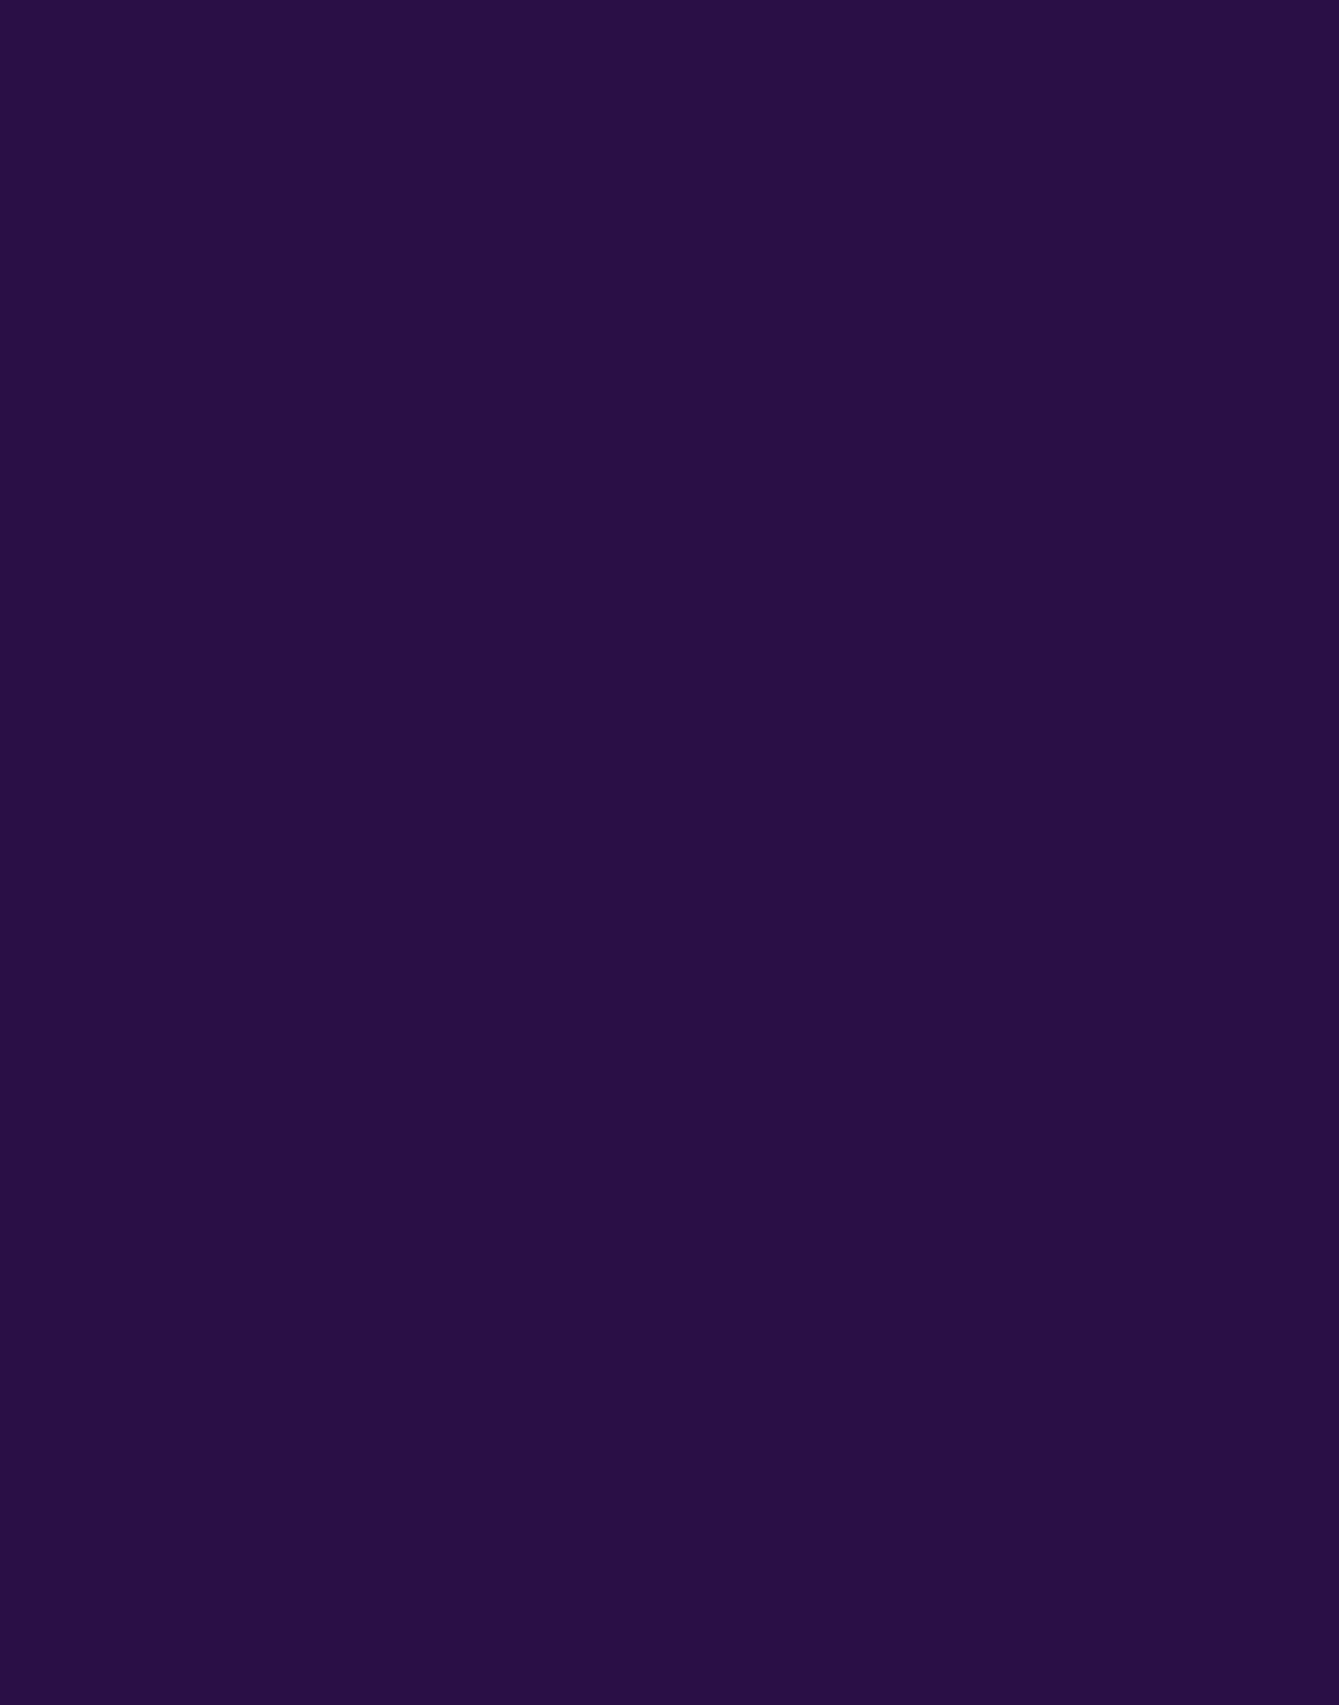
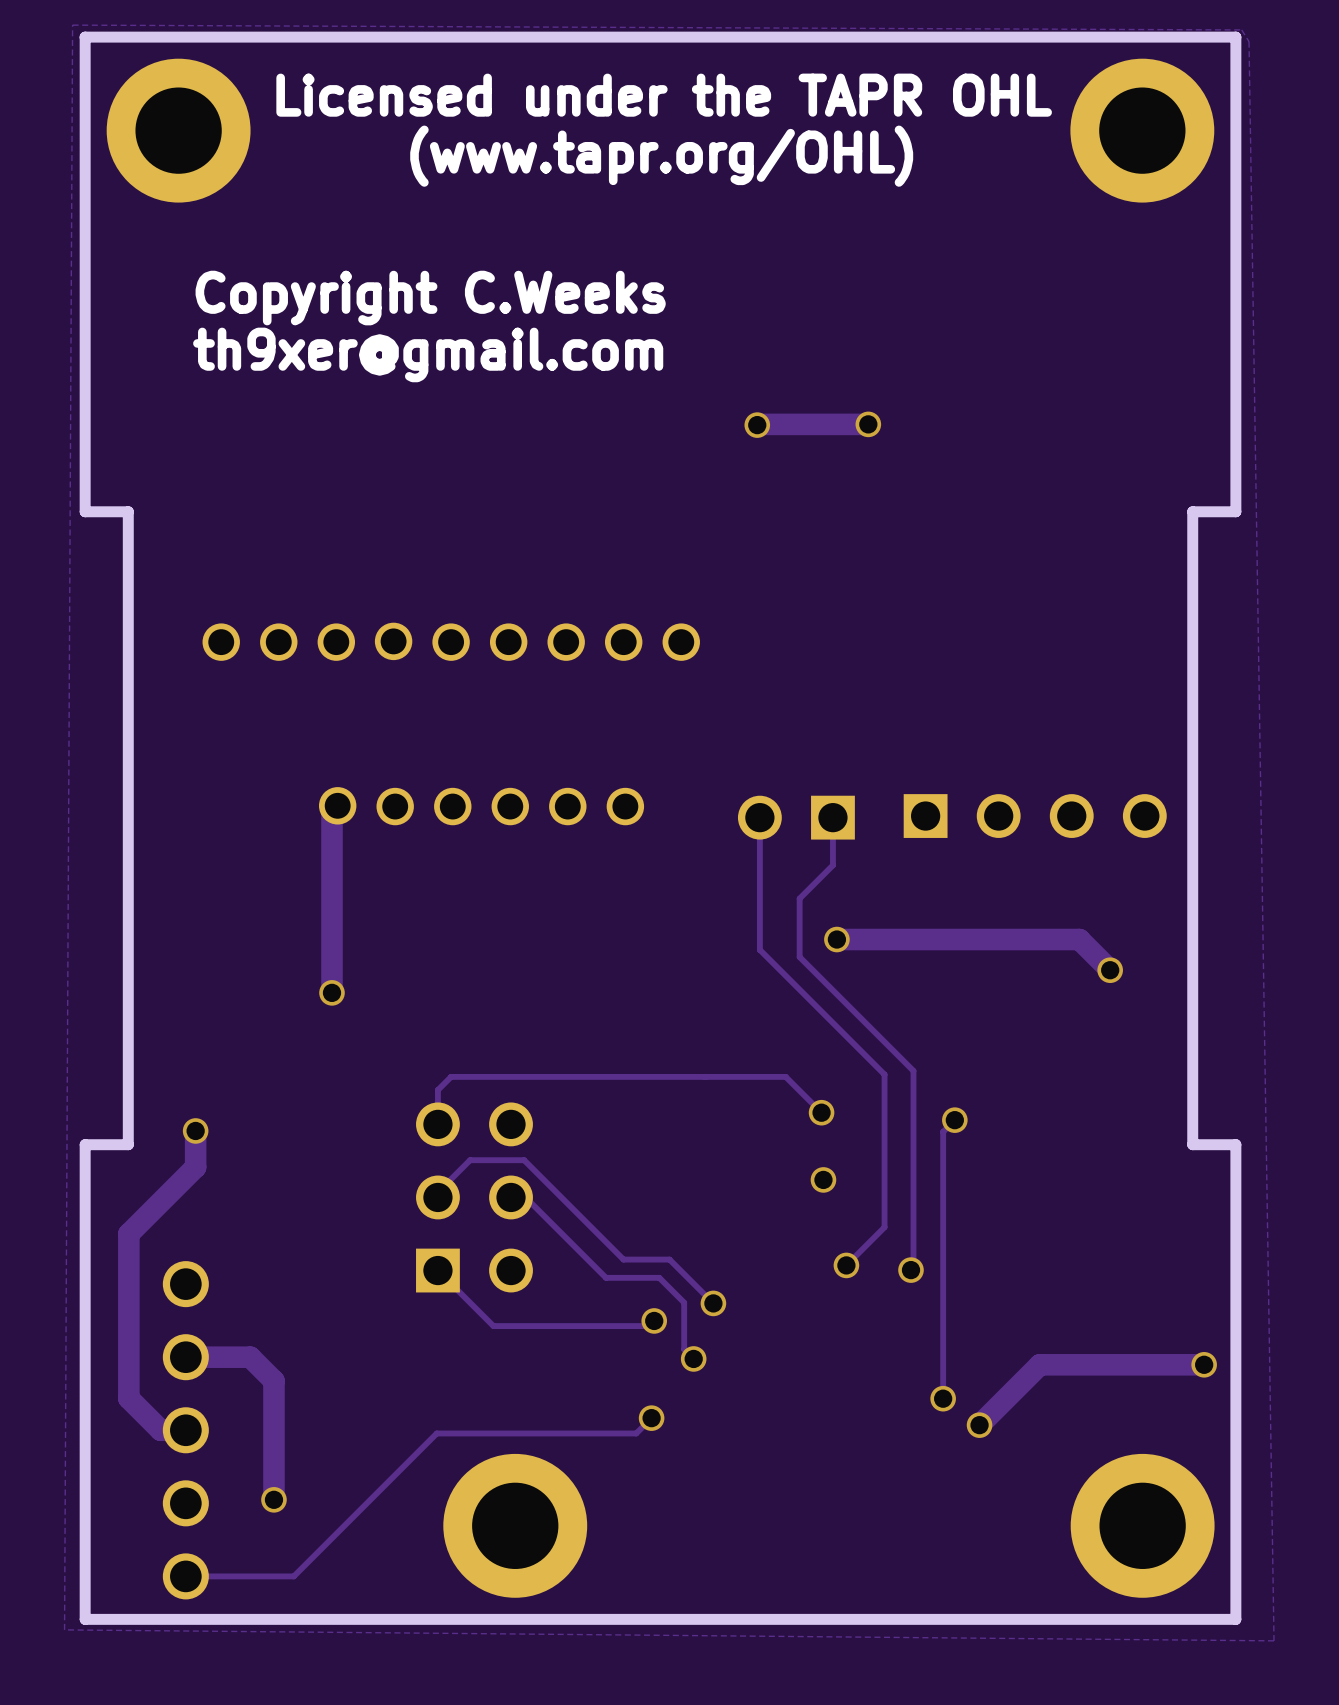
zone outline: none -> (72, 25) (64, 1629) (1274, 1640) (1249, 41) (1241, 29) (72, 25)
board edge: none -> (85, 37) (85, 511) (128, 511) (128, 1144) (85, 1144) (85, 1619) (1235, 1619) (1235, 1144) (1192, 1144) (1192, 511) (1235, 511) (1235, 37) (85, 37)
text: none -> Licensed under the TAPR OHL (664, 95)
part: none -> (178, 130)
part: none -> (1142, 130)
text: none -> (www.tapr.org/OHL) (661, 156)
text: none -> Copyright C.Weeks (430, 298)
text: none -> th9xer@gmail.com (428, 354)
track: none -> (868, 424) (757, 425)
via: none -> (868, 424)
via: none -> (757, 425)
part: none -> (451, 641)
track: none -> (337, 805) (331, 811) (331, 992)
part: none -> (481, 806)
part: none -> (1035, 816)
track: none -> (759, 817) (759, 949) (884, 1074) (884, 1227) (846, 1265)
part: none -> (796, 817)
track: none -> (832, 817) (832, 865) (799, 898) (799, 957) (913, 1070) (913, 1272) (911, 1270)
track: none -> (836, 939) (1079, 939) (1110, 970)
via: none -> (836, 939)
via: none -> (1110, 970)
via: none -> (331, 992)
track: none -> (821, 1112) (785, 1076) (451, 1076) (437, 1090) (437, 1124)
via: none -> (821, 1112)
track: none -> (954, 1120) (943, 1131) (943, 1398)
via: none -> (954, 1120)
track: none -> (195, 1130) (195, 1167) (128, 1234) (128, 1398) (160, 1430) (185, 1430)
via: none -> (195, 1130)
via: none -> (823, 1179)
track: none -> (437, 1197) (437, 1192) (470, 1160) (524, 1160) (623, 1259) (669, 1259) (713, 1303)
part: none -> (474, 1197)
track: none -> (511, 1197) (525, 1197) (606, 1277) (659, 1277) (684, 1302) (684, 1349) (693, 1358)
via: none -> (846, 1265)
track: none -> (437, 1270) (493, 1326) (649, 1326) (654, 1320)
via: none -> (911, 1270)
via: none -> (713, 1303)
via: none -> (654, 1320)
track: none -> (185, 1357) (250, 1357) (273, 1380) (273, 1499)
via: none -> (693, 1358)
track: none -> (1204, 1364) (1039, 1364) (979, 1425)
via: none -> (1204, 1364)
via: none -> (943, 1398)
track: none -> (651, 1418) (636, 1433) (436, 1433) (293, 1576) (185, 1576)
via: none -> (651, 1418)
via: none -> (979, 1425)
part: none -> (185, 1430)
via: none -> (273, 1499)
part: none -> (515, 1525)
part: none -> (1142, 1525)

